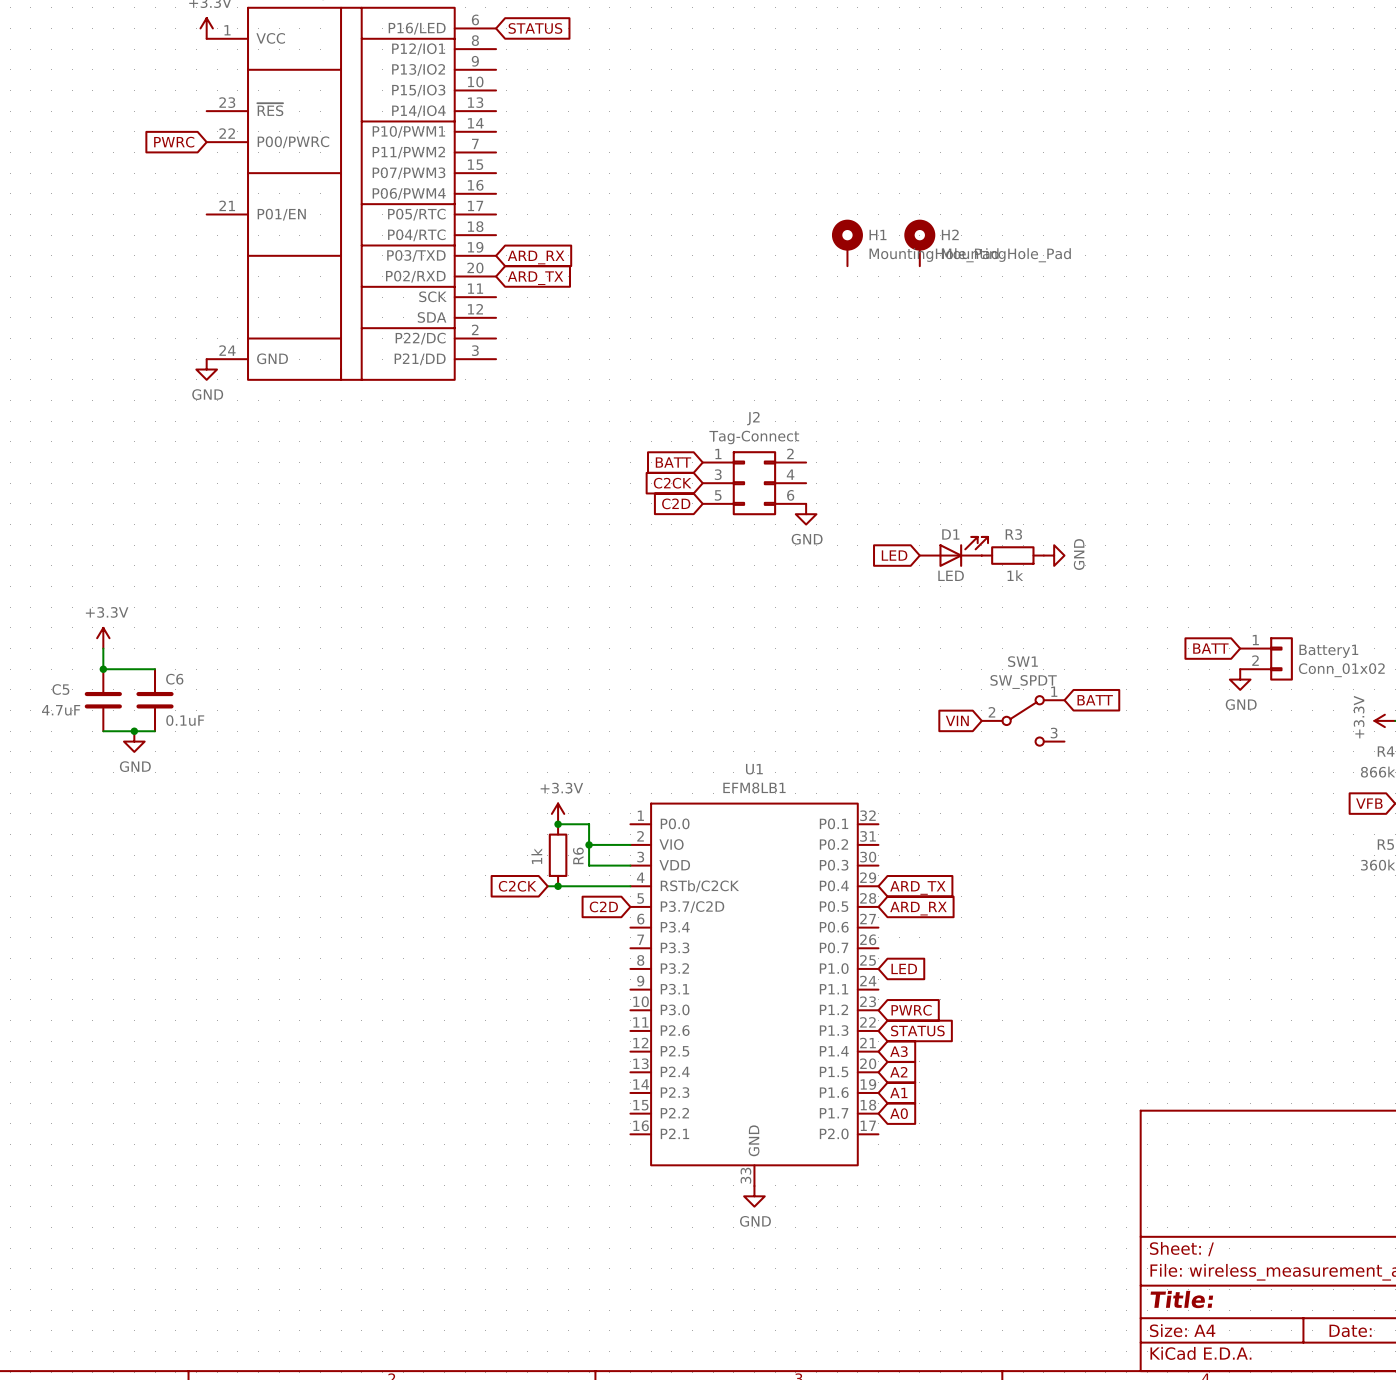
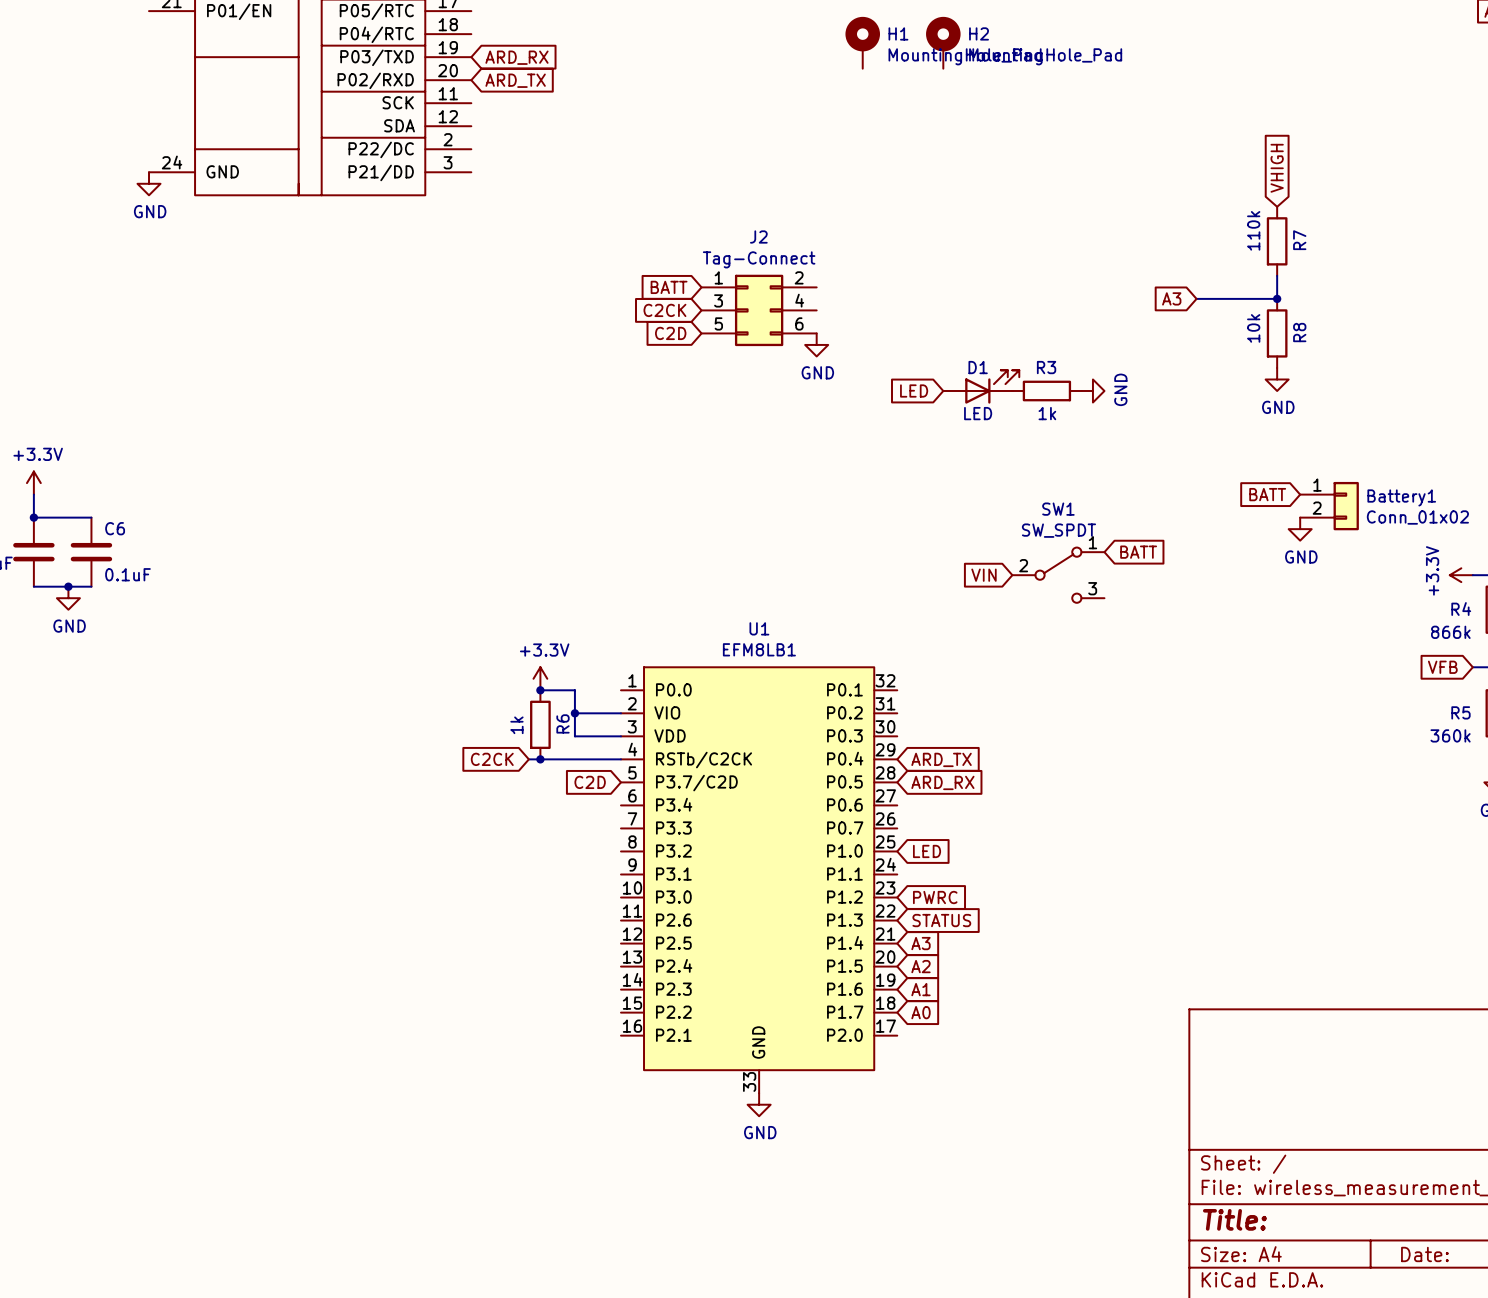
global label: none -> VHIGH (1277, 168)
R7: none -> 110k (1277, 241)
wire: none -> (1277, 275) (1277, 298) (1196, 298)
global label: none -> A3 (1171, 298)
junction: none -> (1277, 298)
R8: none -> 10k (1277, 333)
power symbol: none -> GND (1277, 379)

